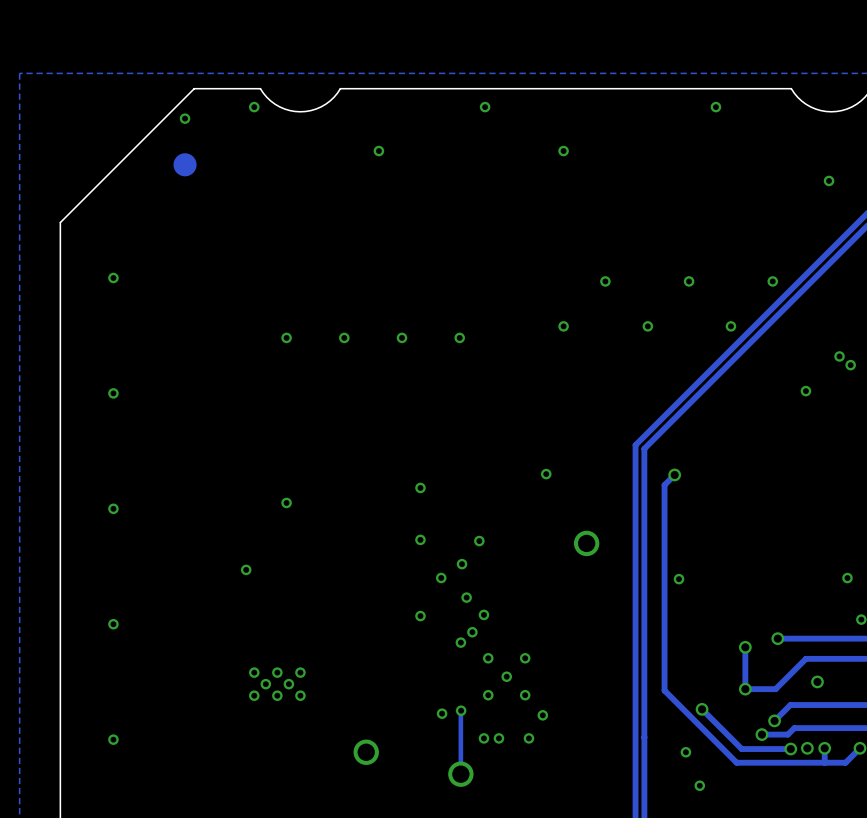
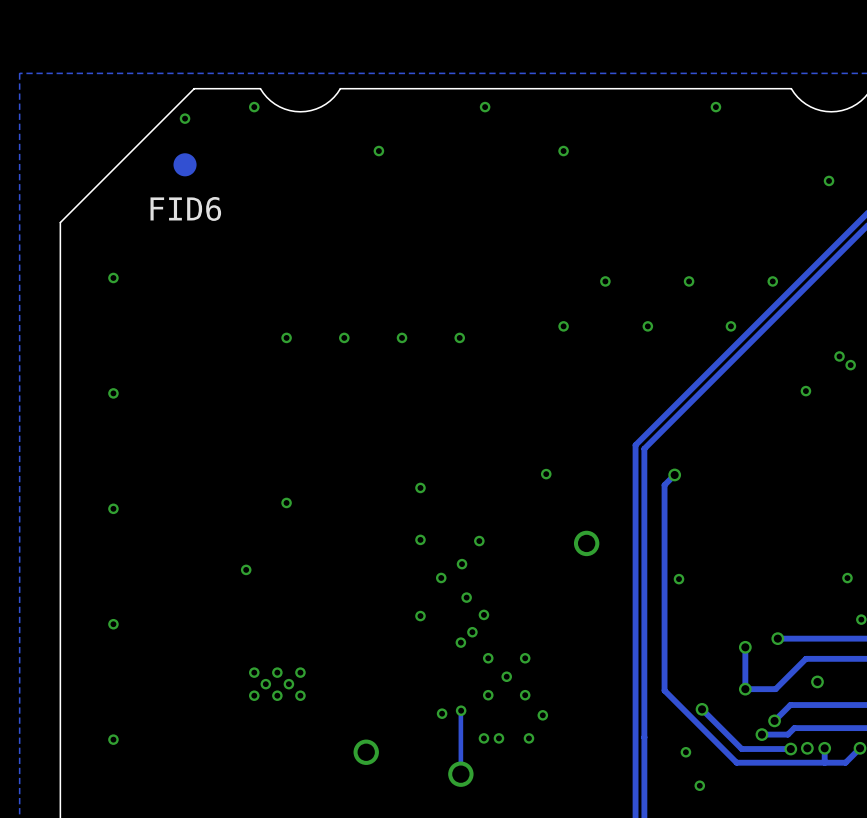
FID6 name: none -> FID6 (185, 208)

